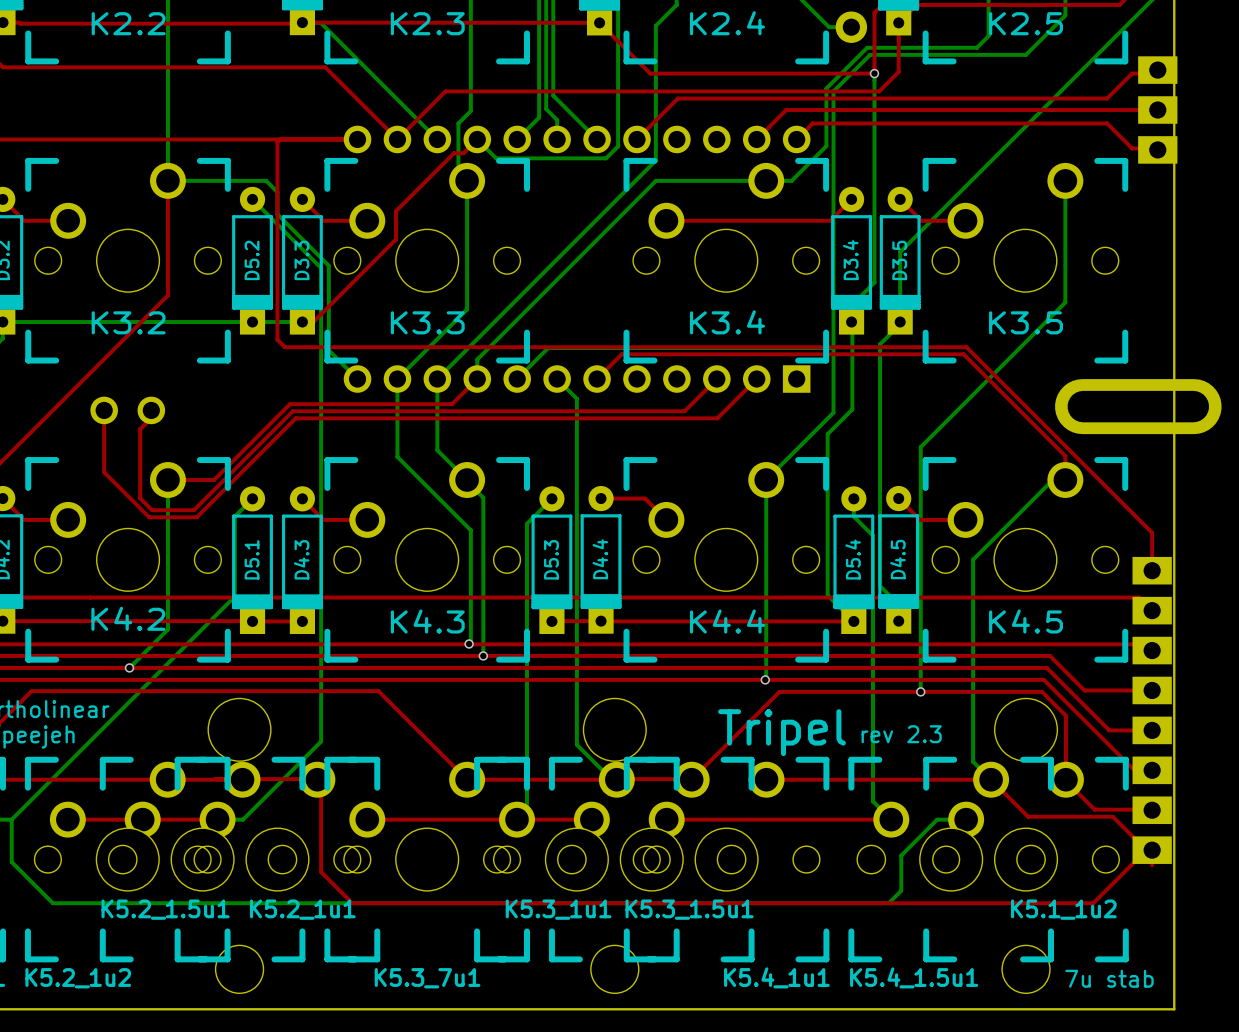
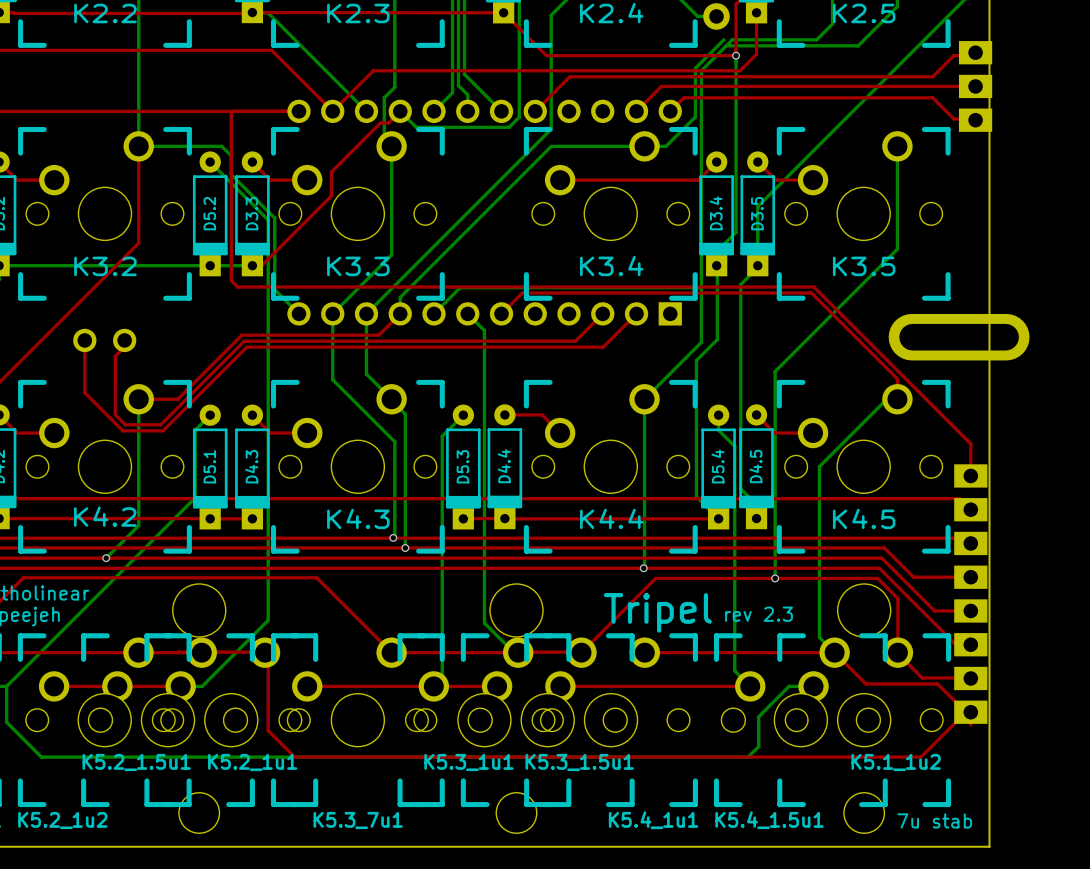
bottom track: (976, 47) (867, 47) (860, 54) -> none
bottom track: (969, 54) (1026, 54) -> (816, 39) (822, 33)
bottom track: none -> (864, 39) (858, 45) (726, 45)

